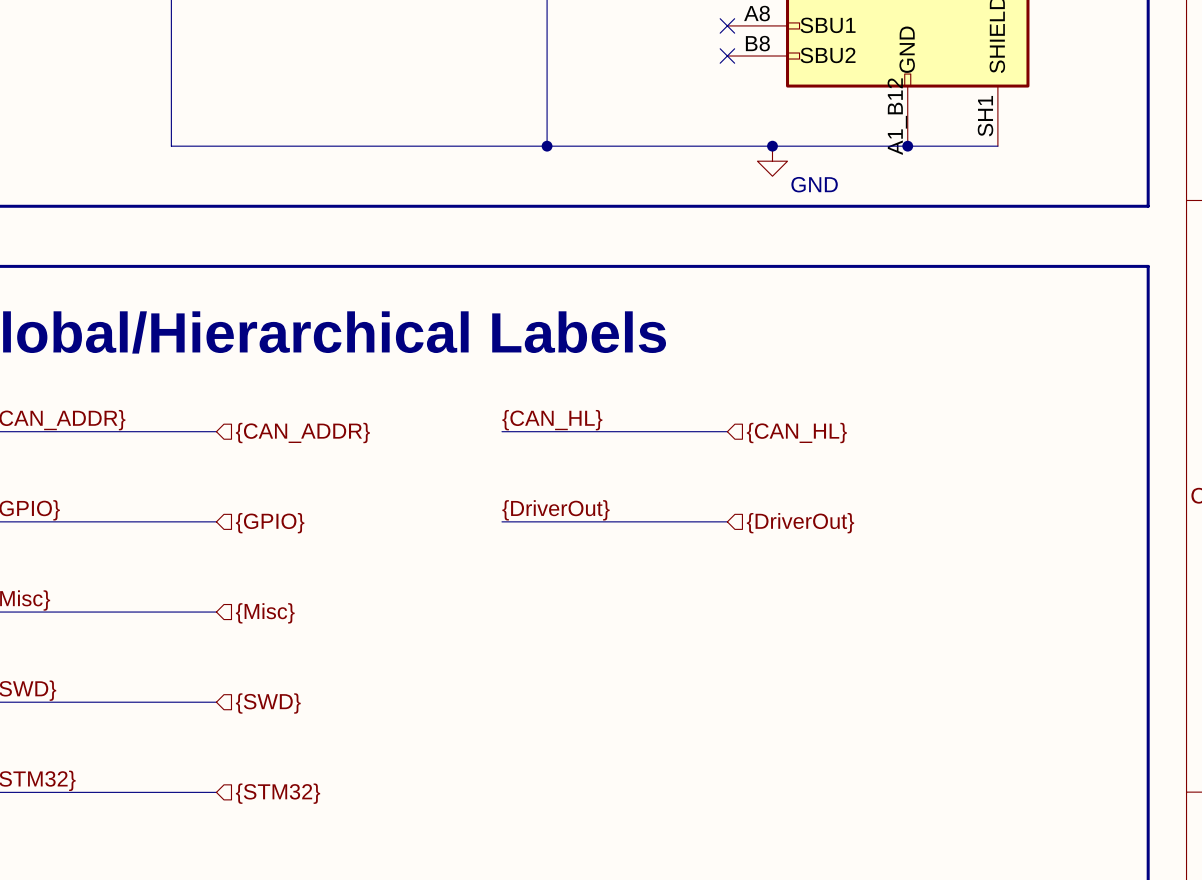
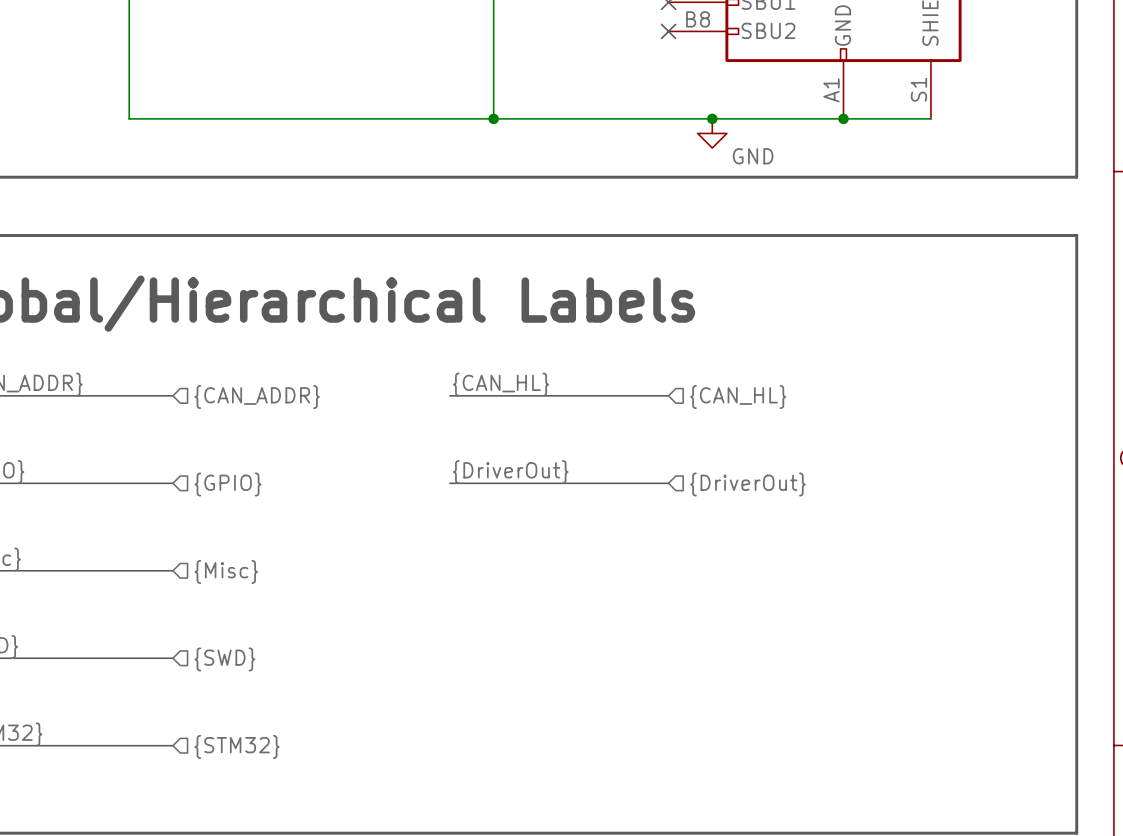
part pin number: A1_B12 (897, 116) -> A1 (831, 90)
part pin number: SH1 (985, 116) -> S1 (918, 89)

